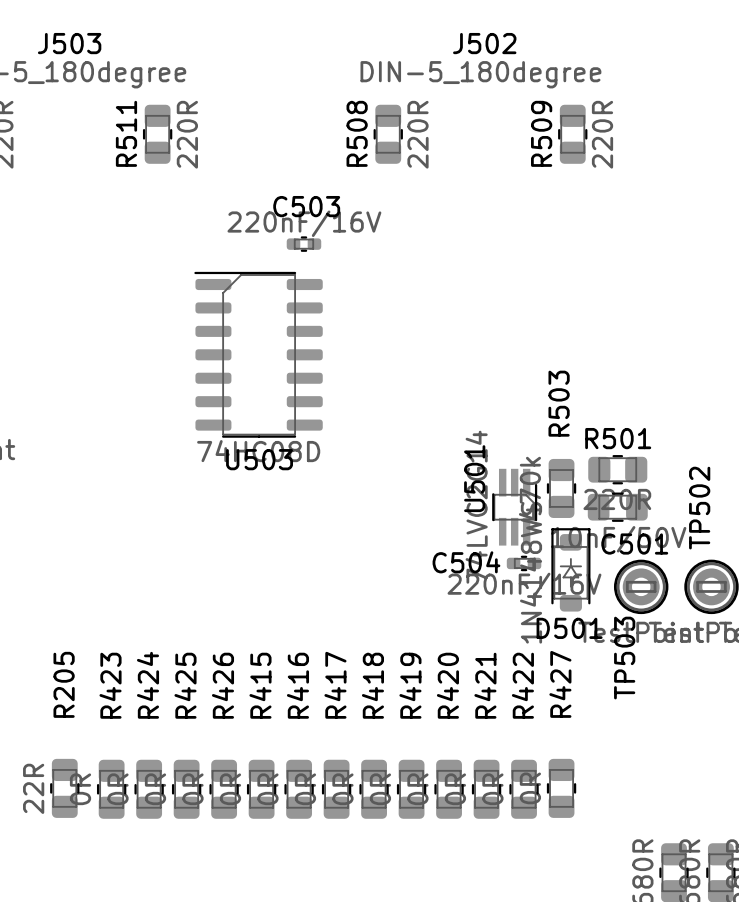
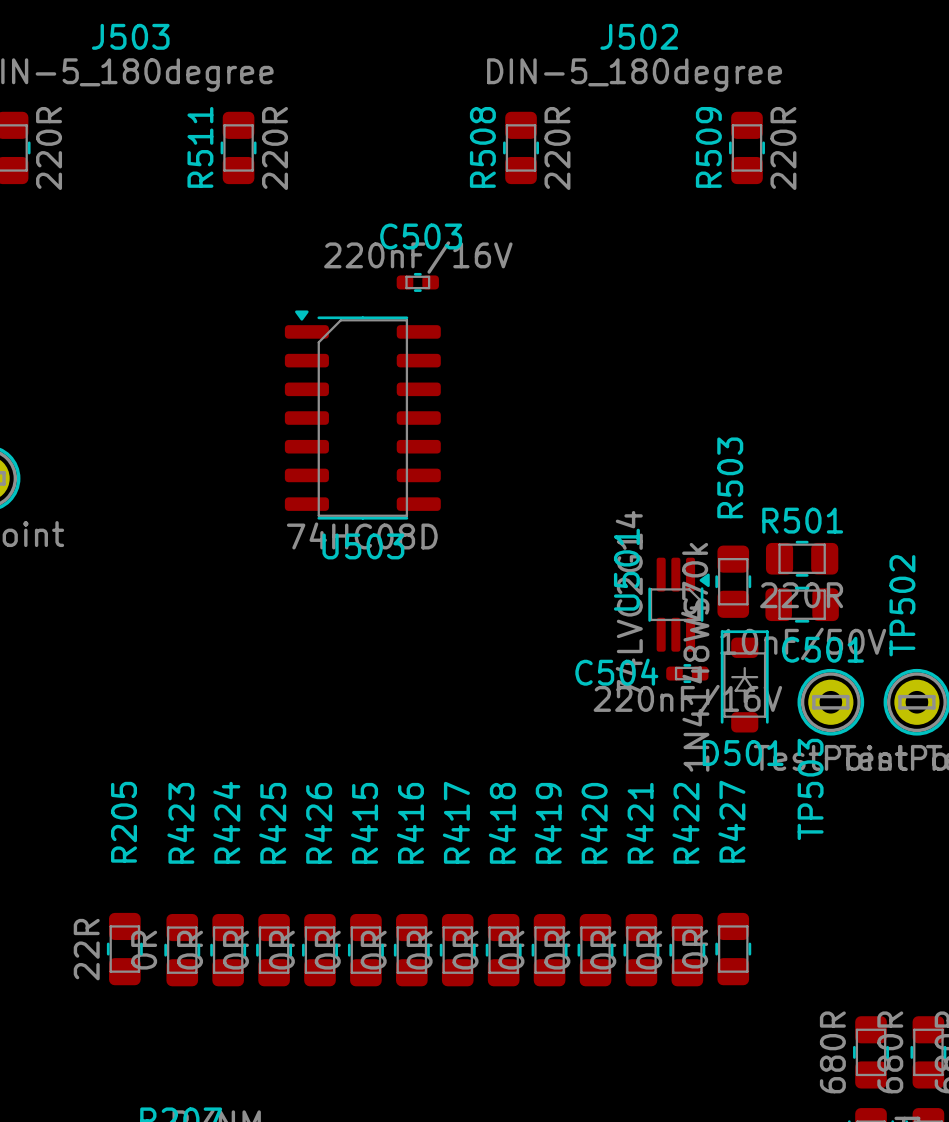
U503 footprint: [194, 271, 323, 438] -> [284, 310, 441, 520]
U501 footprint: [492, 468, 538, 546] -> [648, 557, 710, 652]

